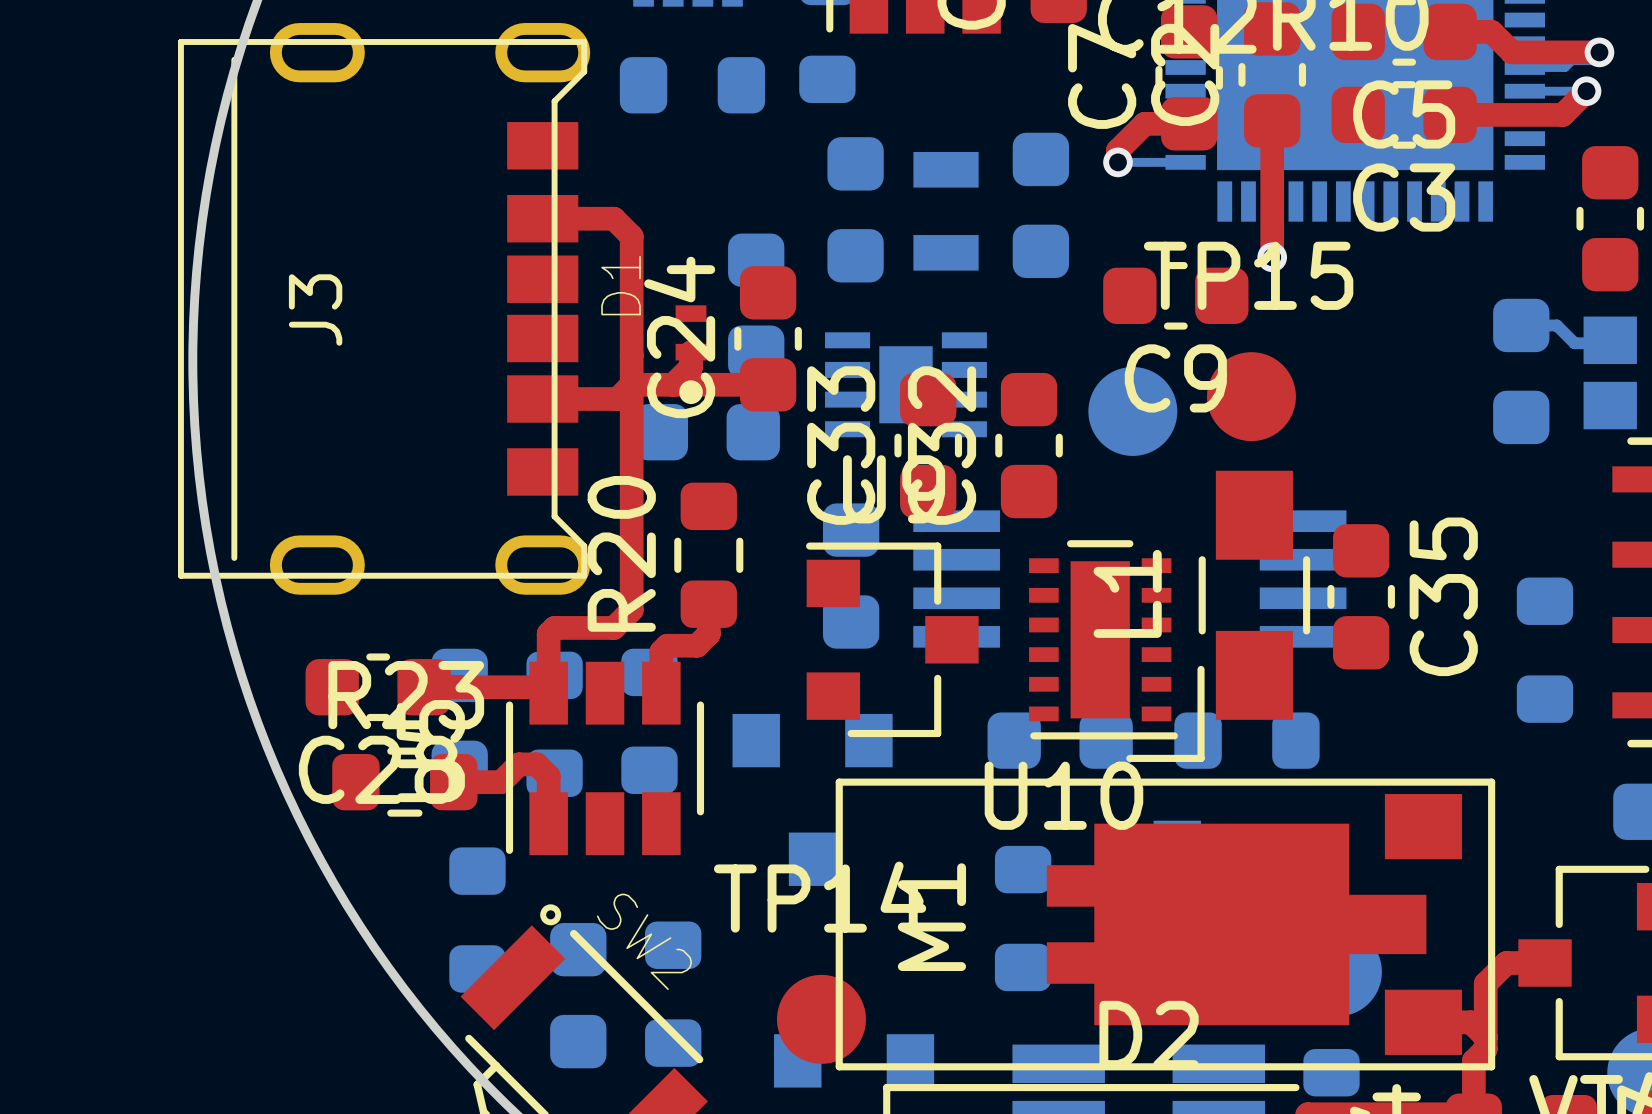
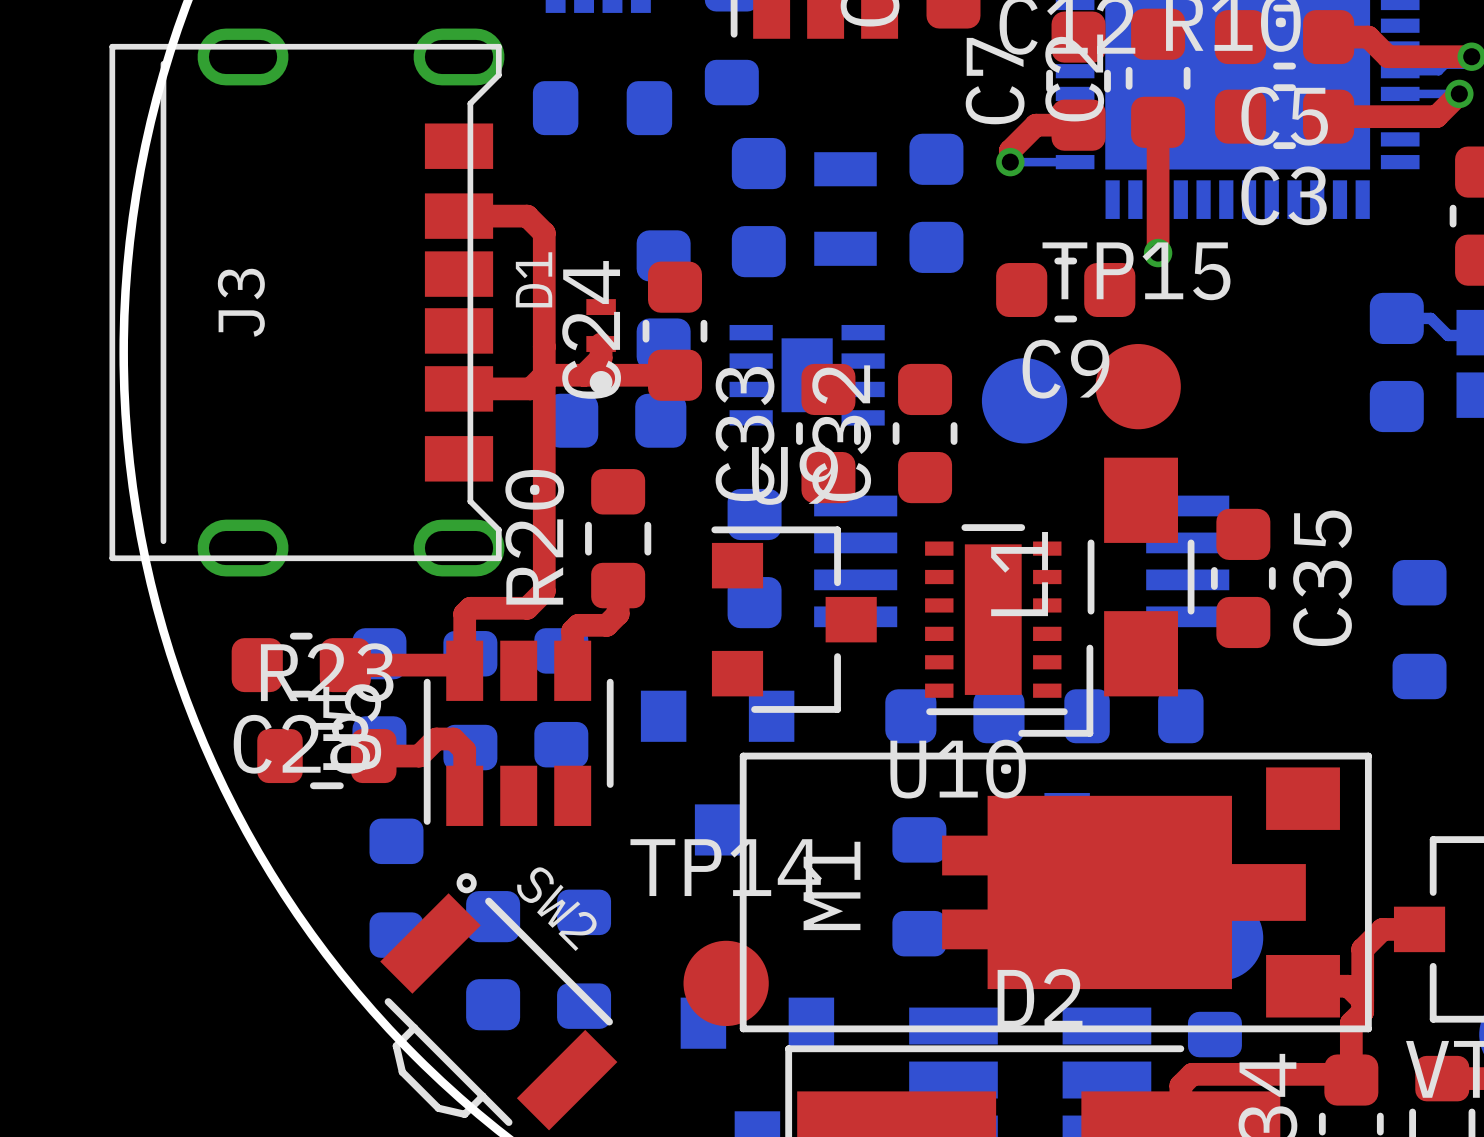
part position: (692, 85) -> (602, 108)

